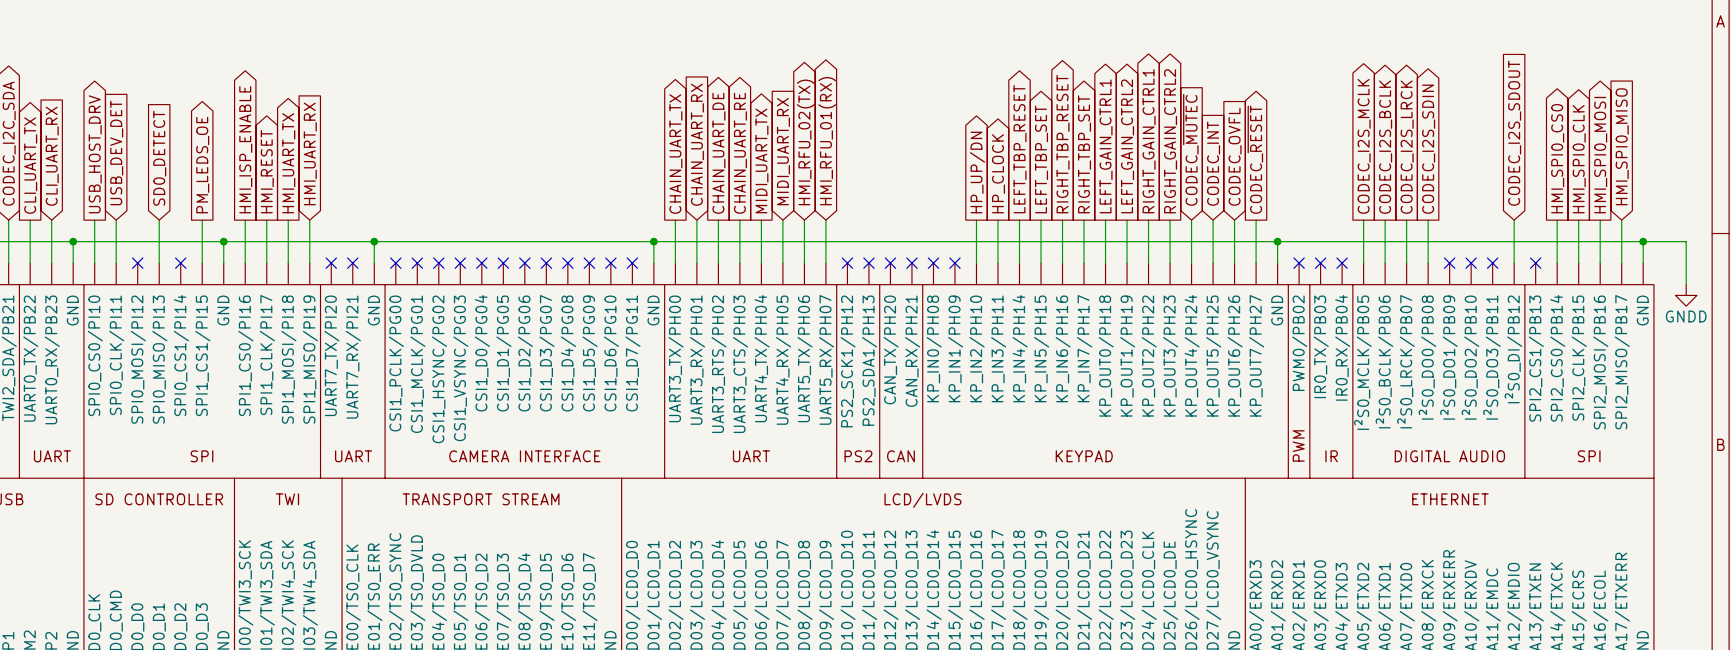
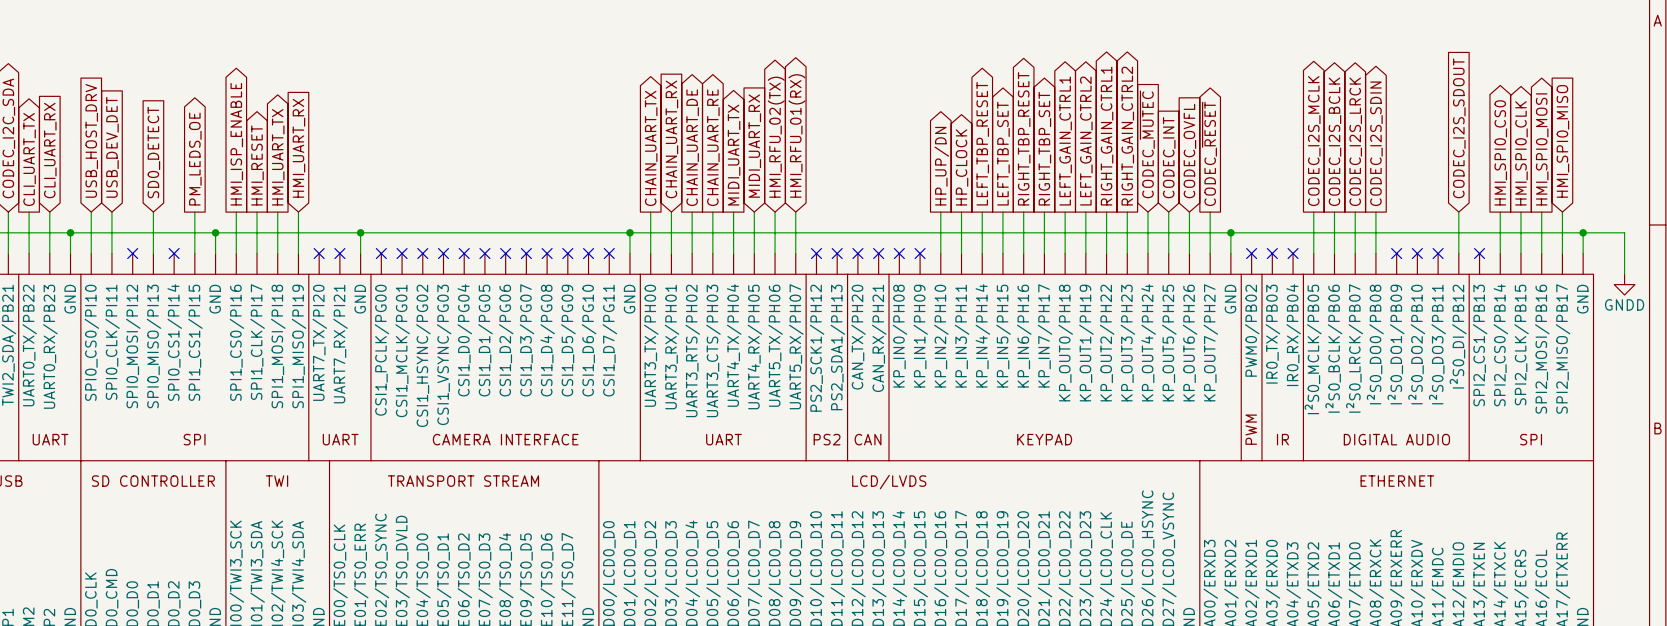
global label shape: output (95, 154) -> input (91, 140)

